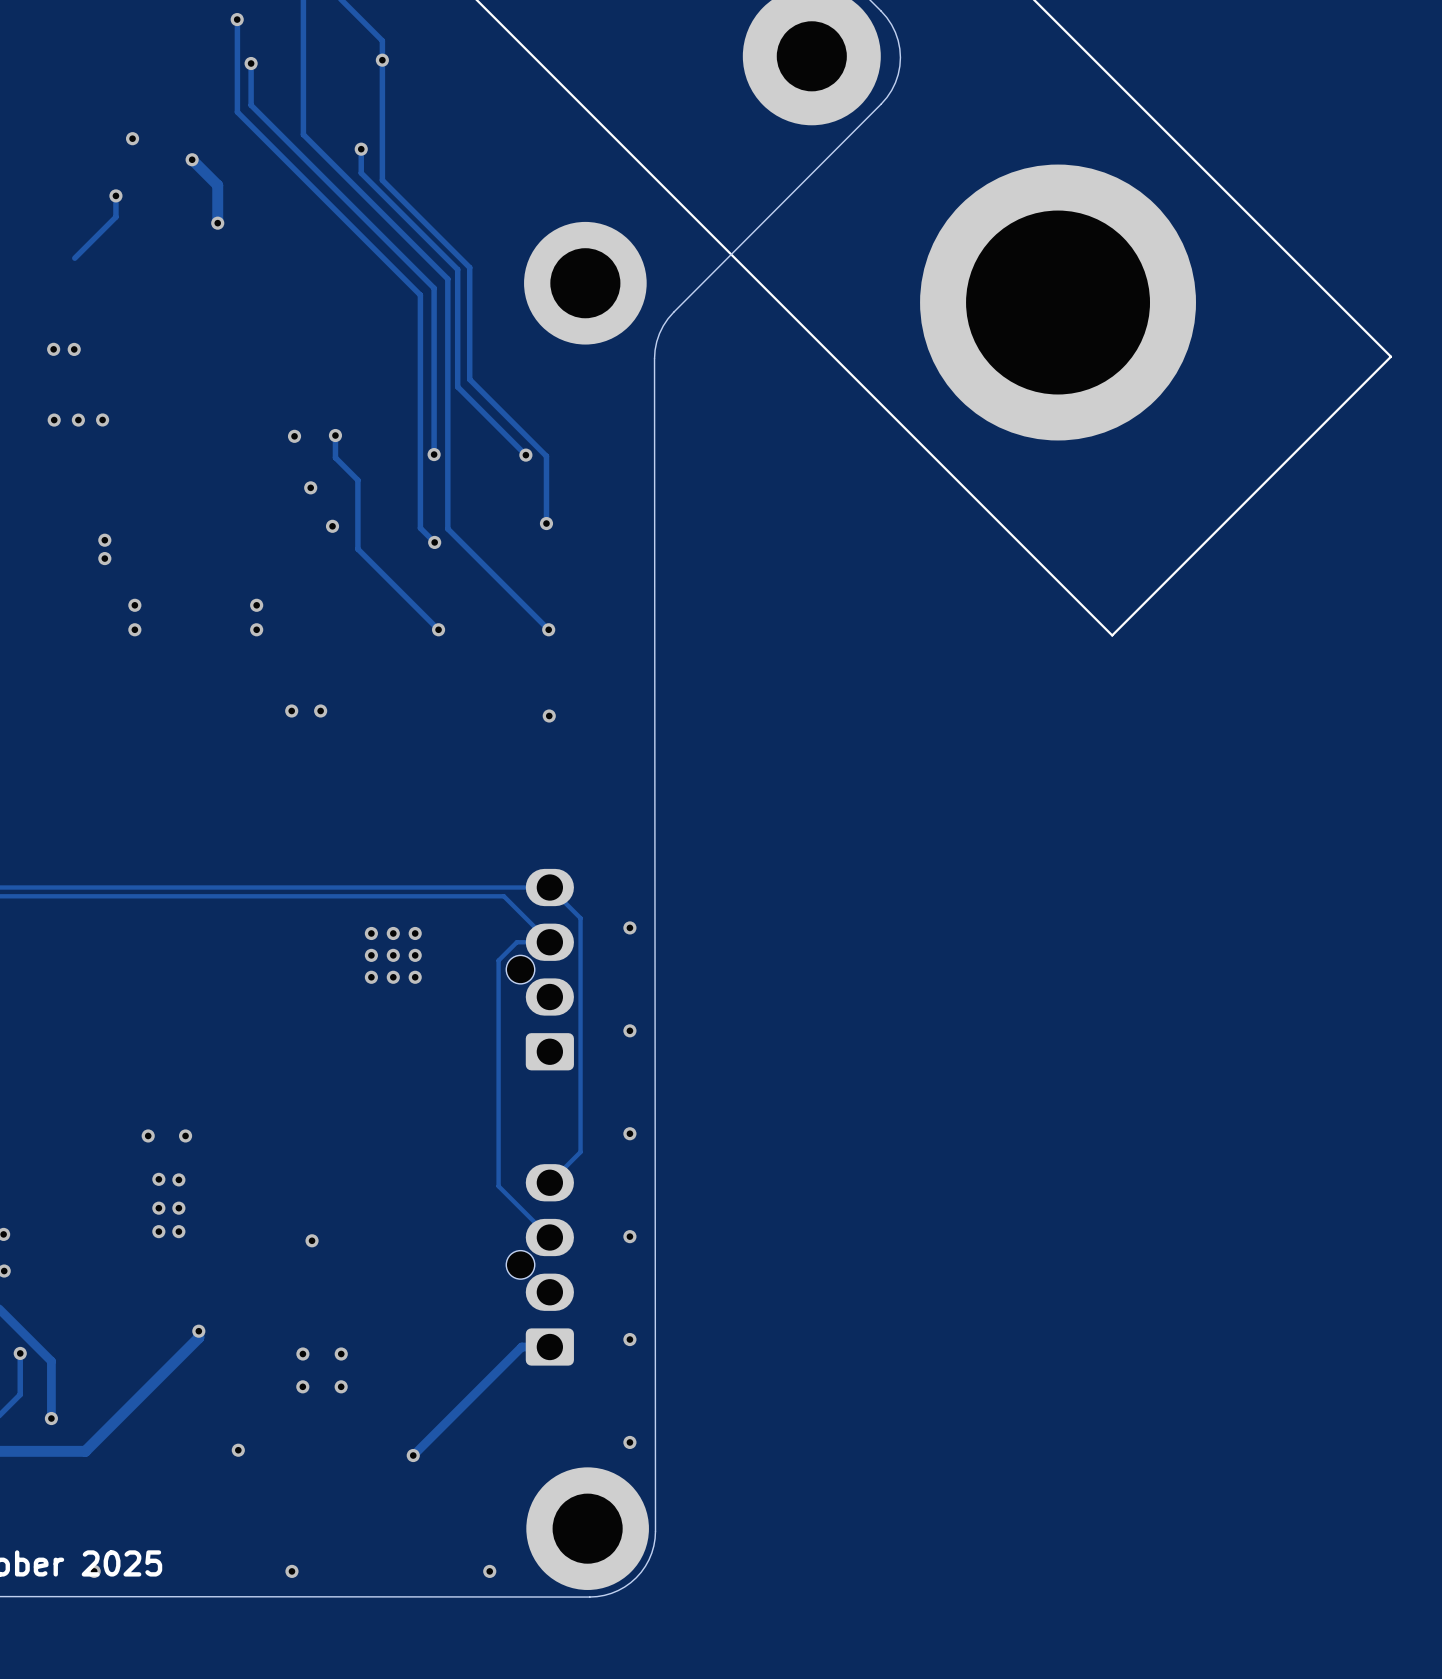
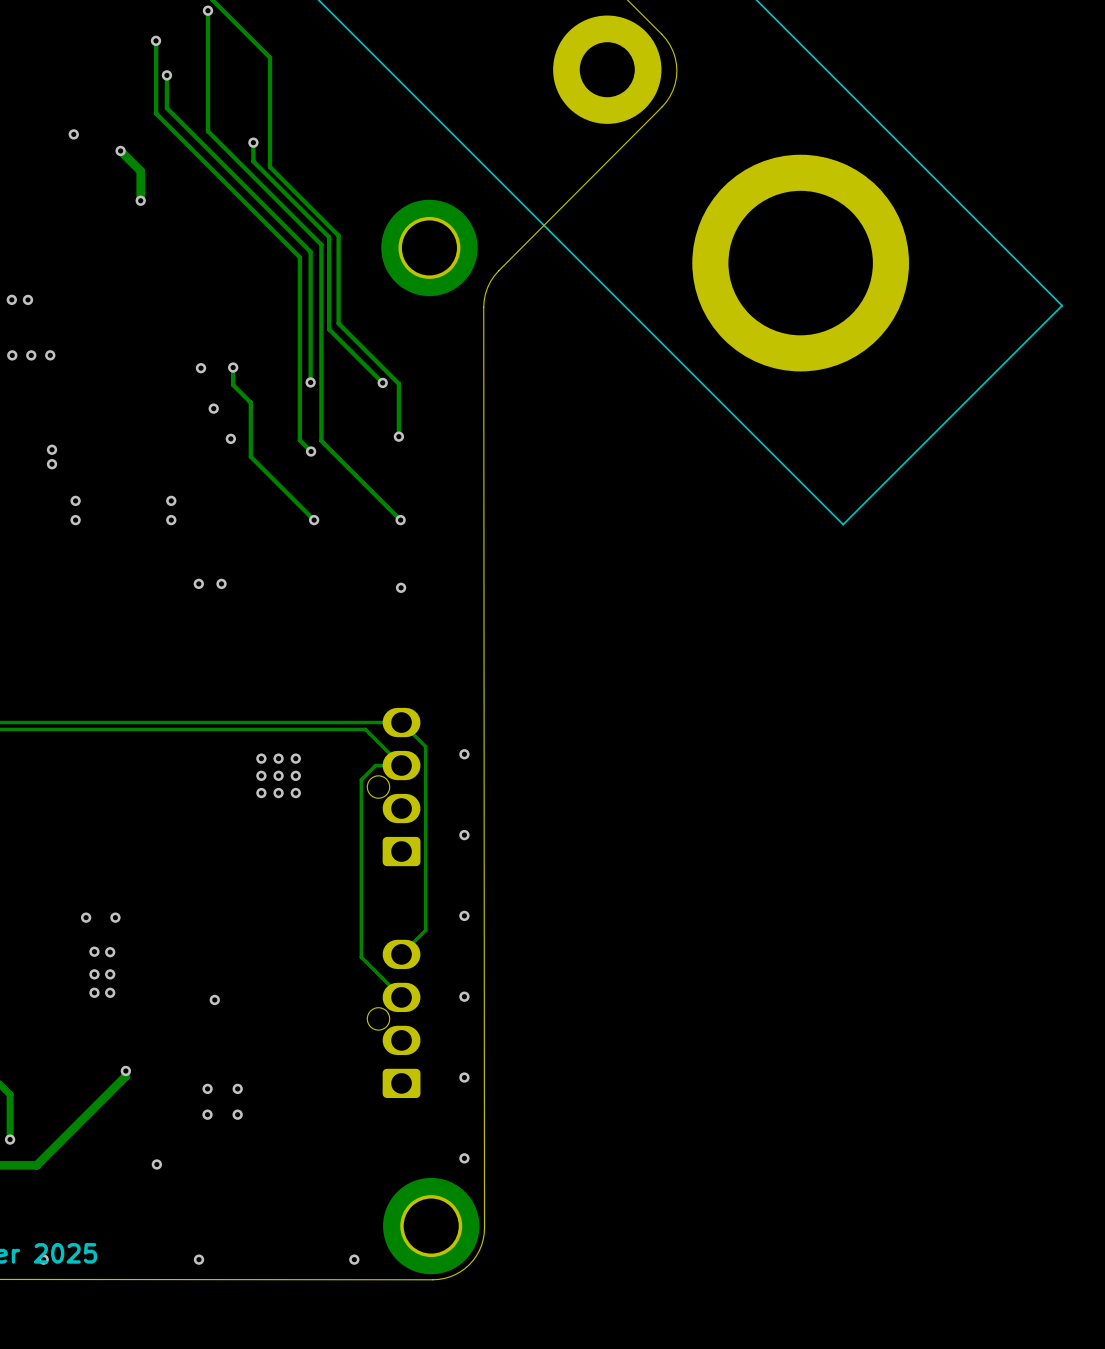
via: (382, 60) -> none
track: (115, 195) (115, 217) (74, 258) -> none
via: (115, 195) -> none
track: (549, 1347) (521, 1347) (413, 1455) -> none
via: (413, 1455) -> none

